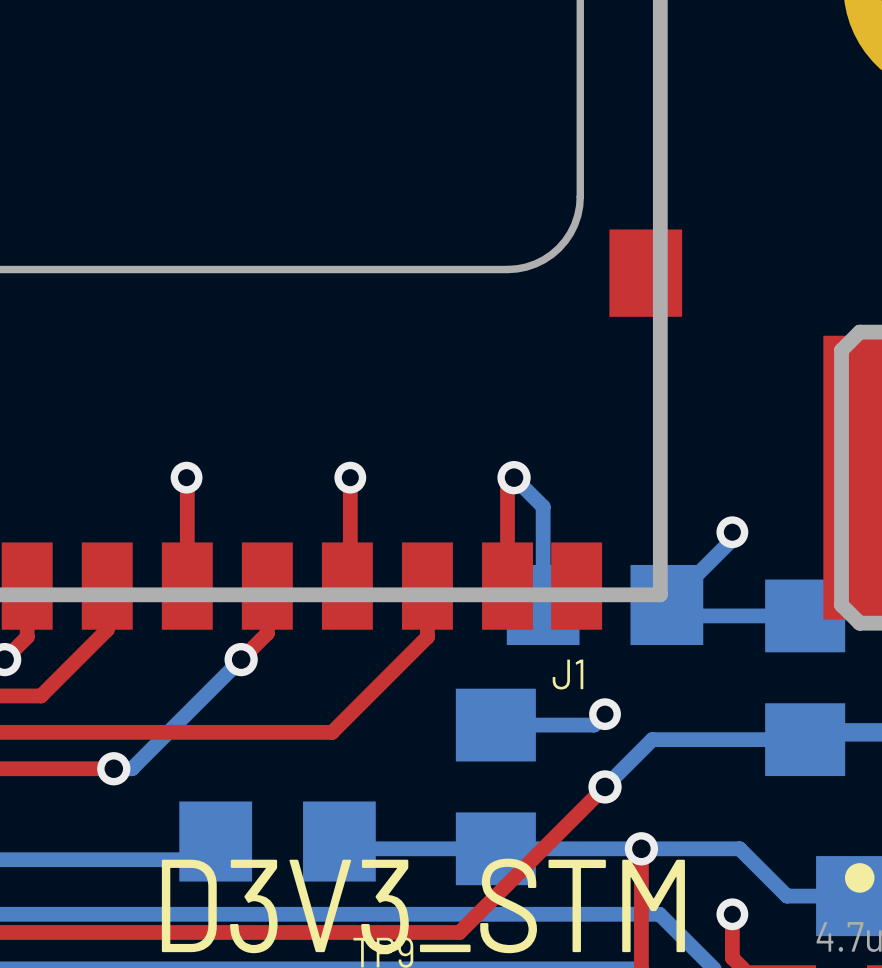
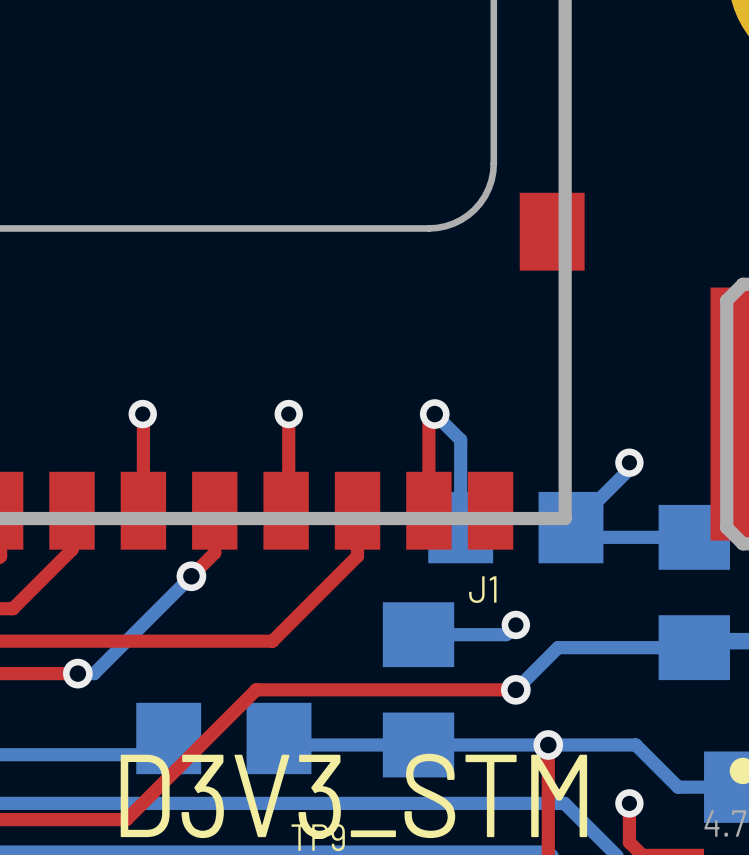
top track: (605, 786) (459, 932) (168, 932) -> (515, 689) (256, 689) (126, 819)

